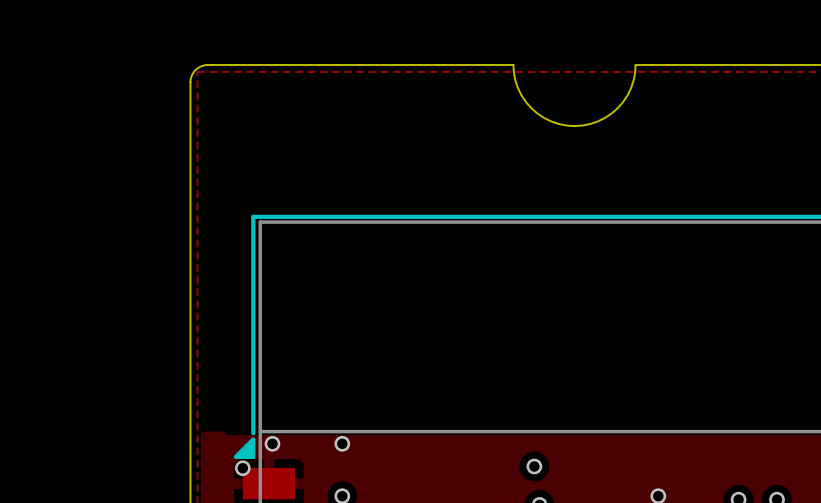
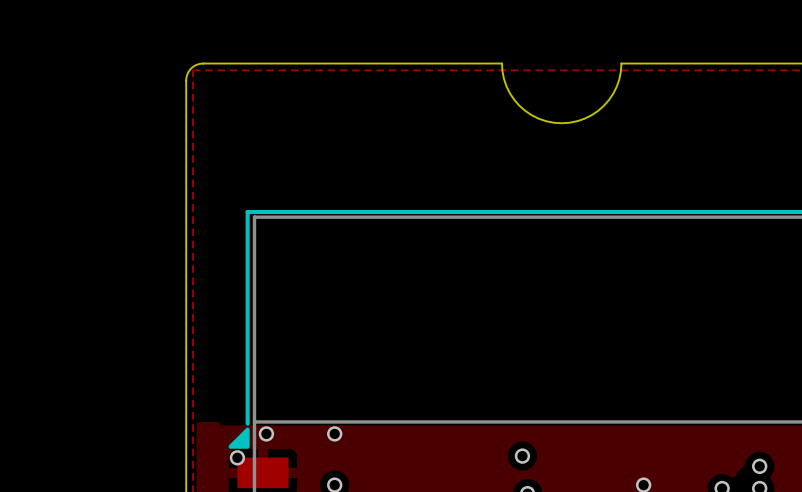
via: none -> (759, 466)

